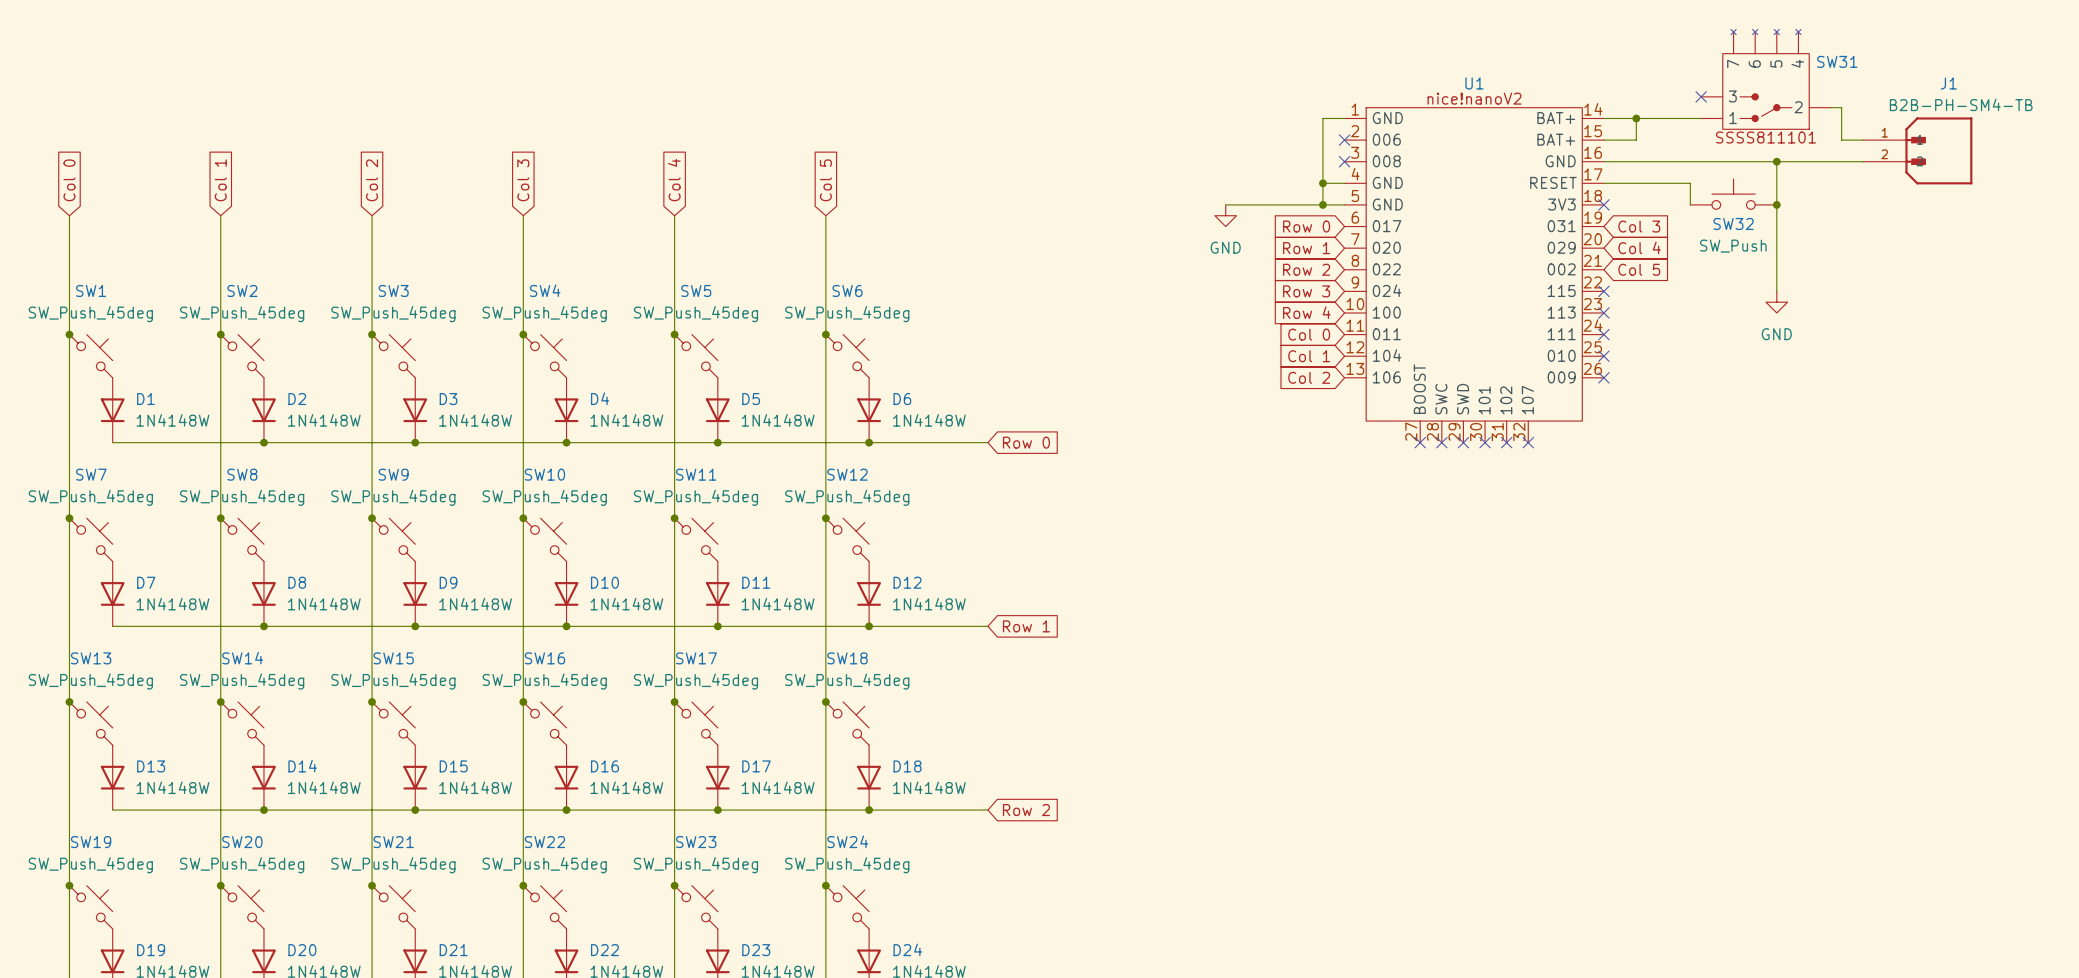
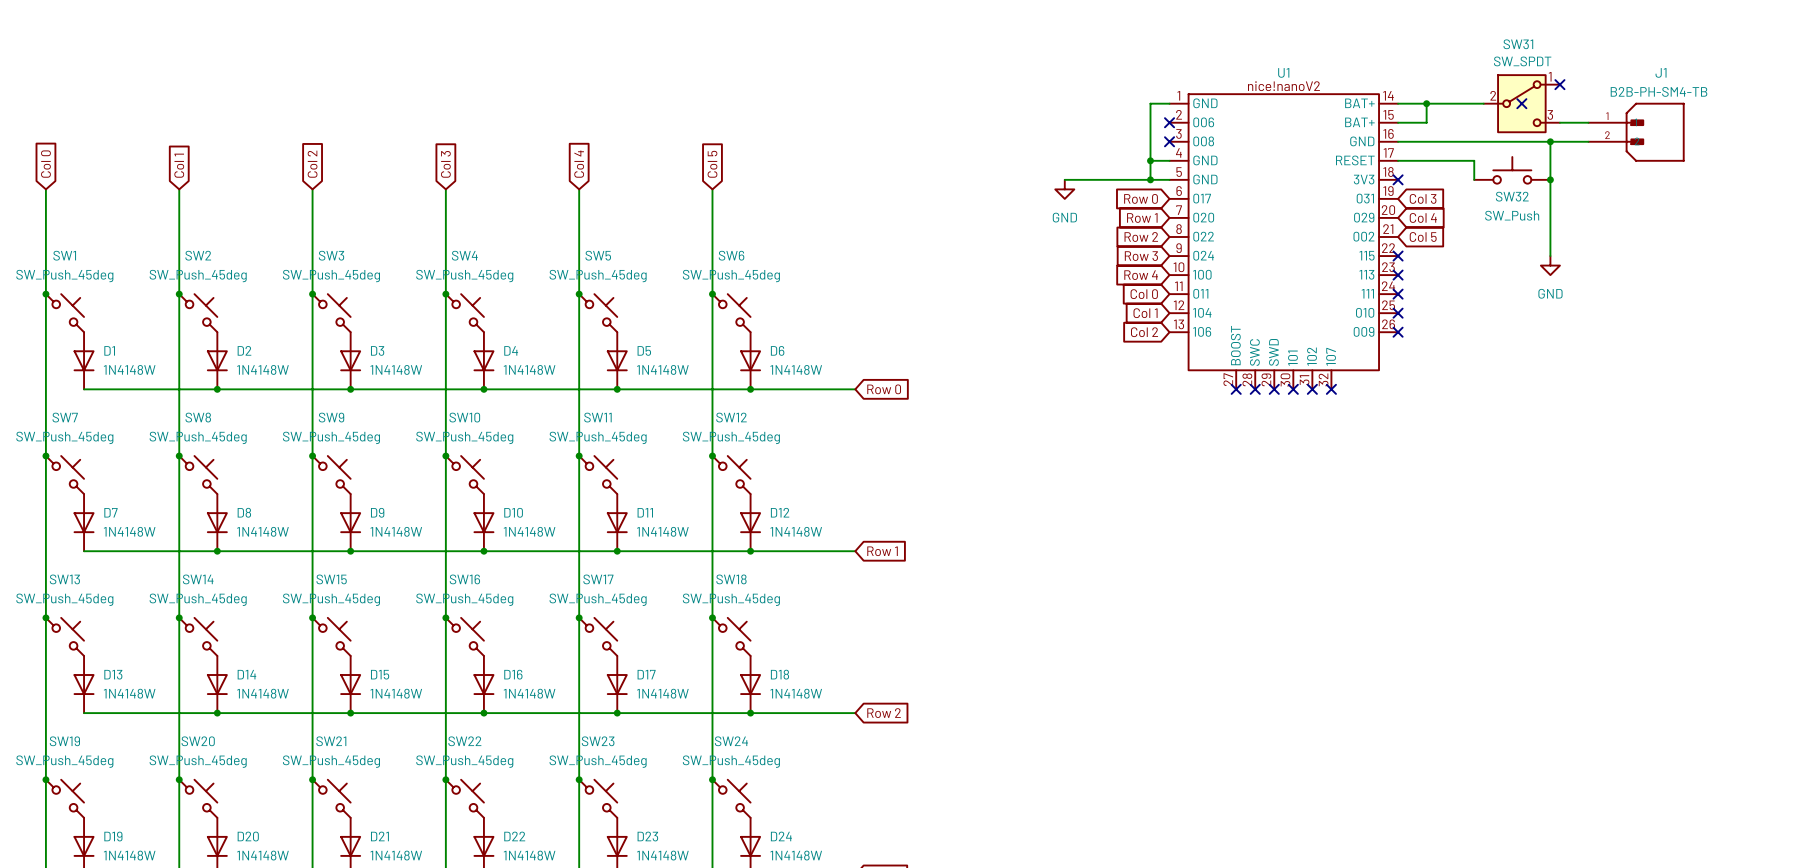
SW31 symbol: [1701, 29, 1831, 130] -> [1483, 75, 1560, 133]
SW31 name position: SW31 (1837, 61) -> SW31 (1518, 44)
SW31 value: none -> SW_SPDT (1522, 61)
no-connect mark: (1701, 96) -> none
no-connect mark: none -> (1559, 84)
wire: (1830, 107) (1841, 107) (1841, 140) (1863, 140) -> none
no-connect mark: none -> (1521, 103)
wire: none -> (1559, 122) (1588, 122)
J1 position: (1917, 150) -> (1636, 132)

